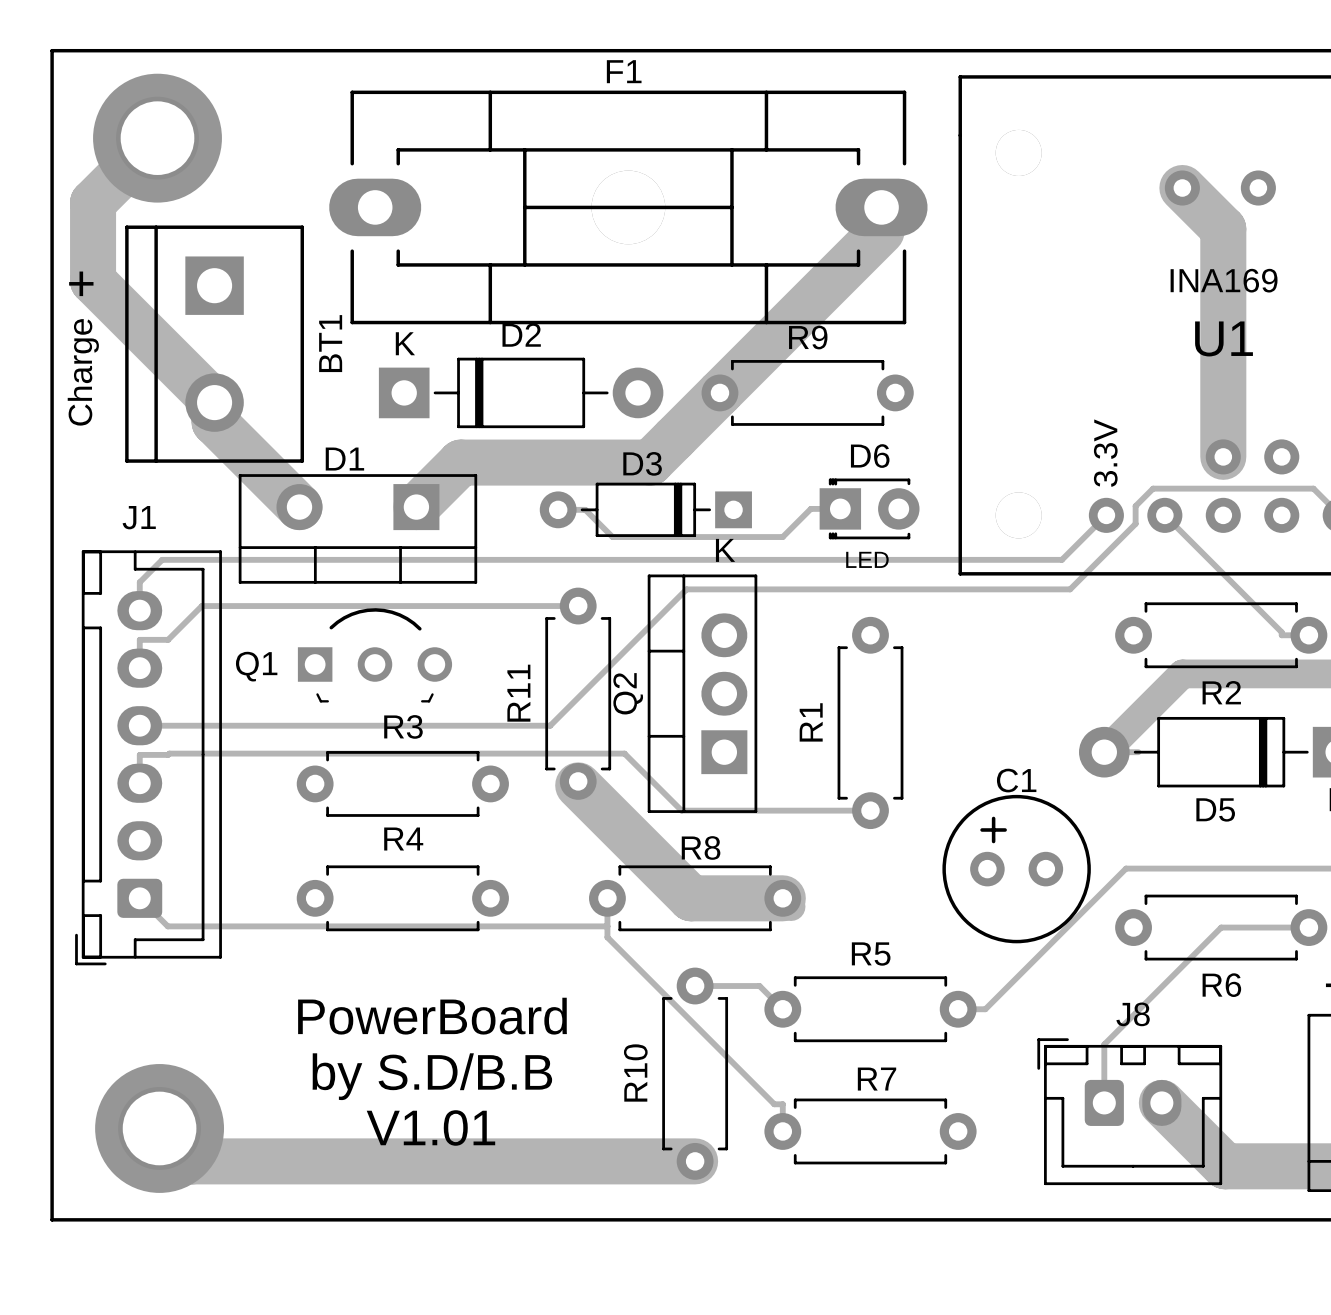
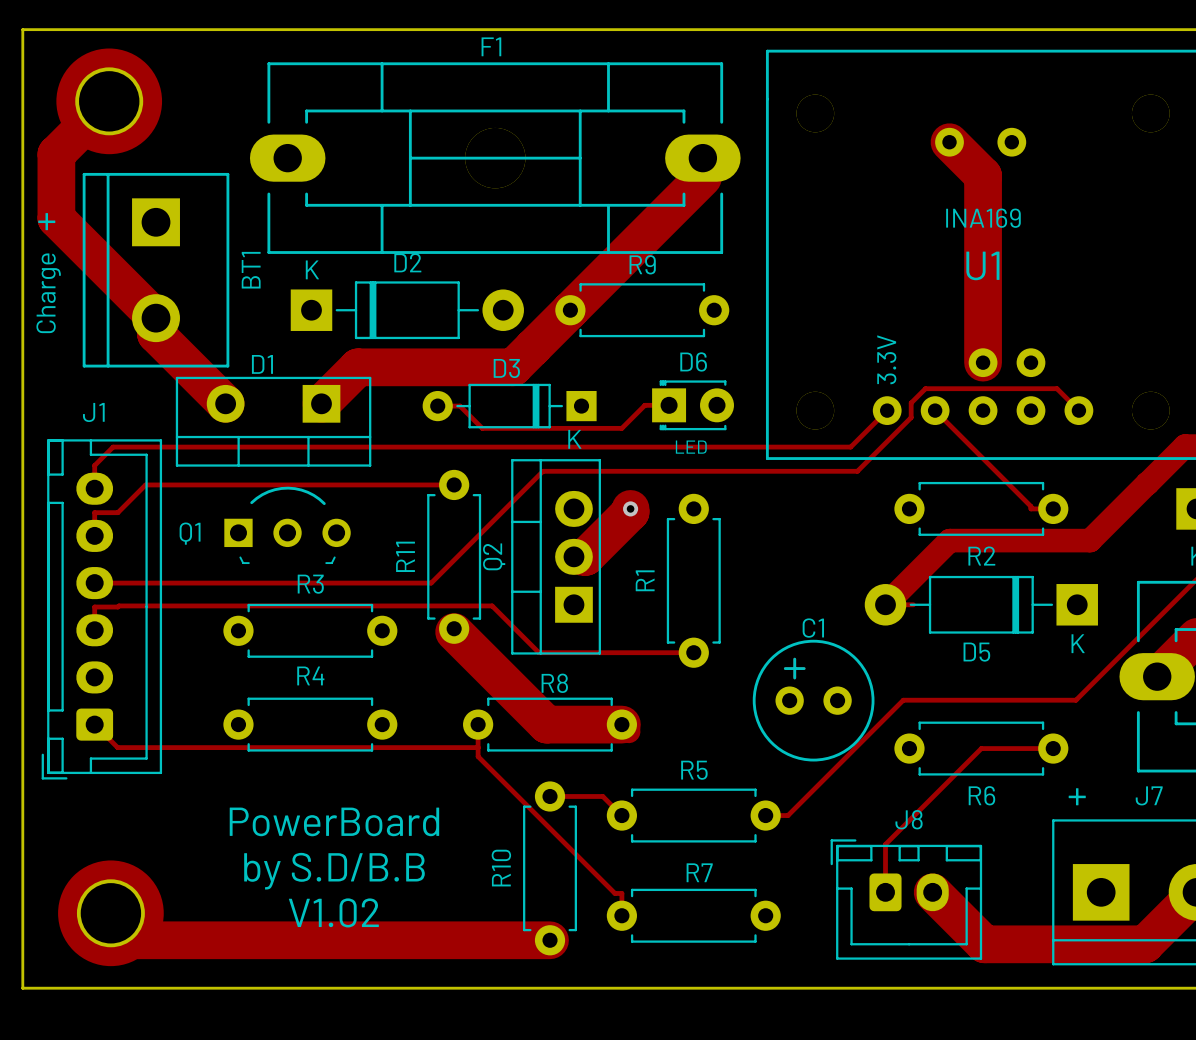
track: none -> (630, 508) (630, 512) (585, 556) (573, 556)
via: none -> (630, 508)
text: V1.01 (430, 1127) -> V1.02 (333, 912)

